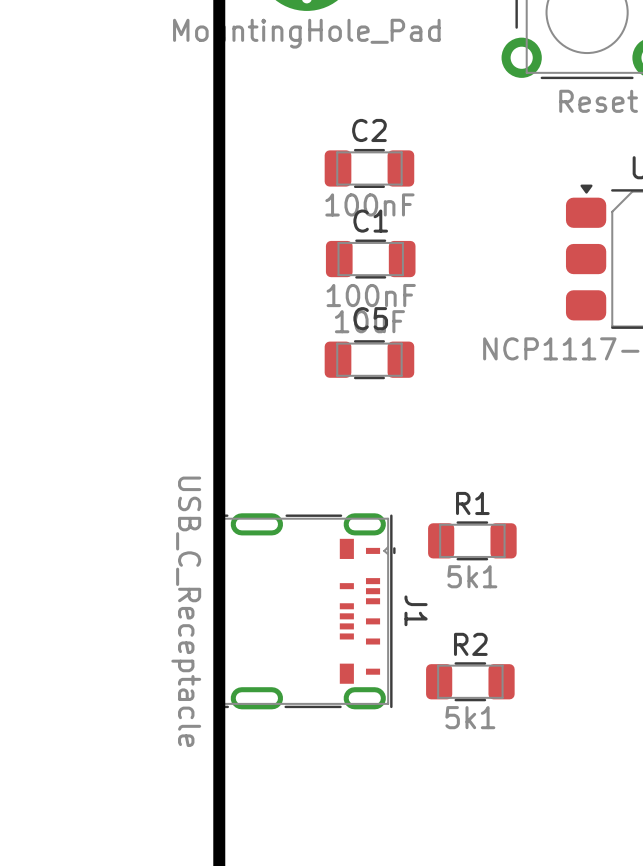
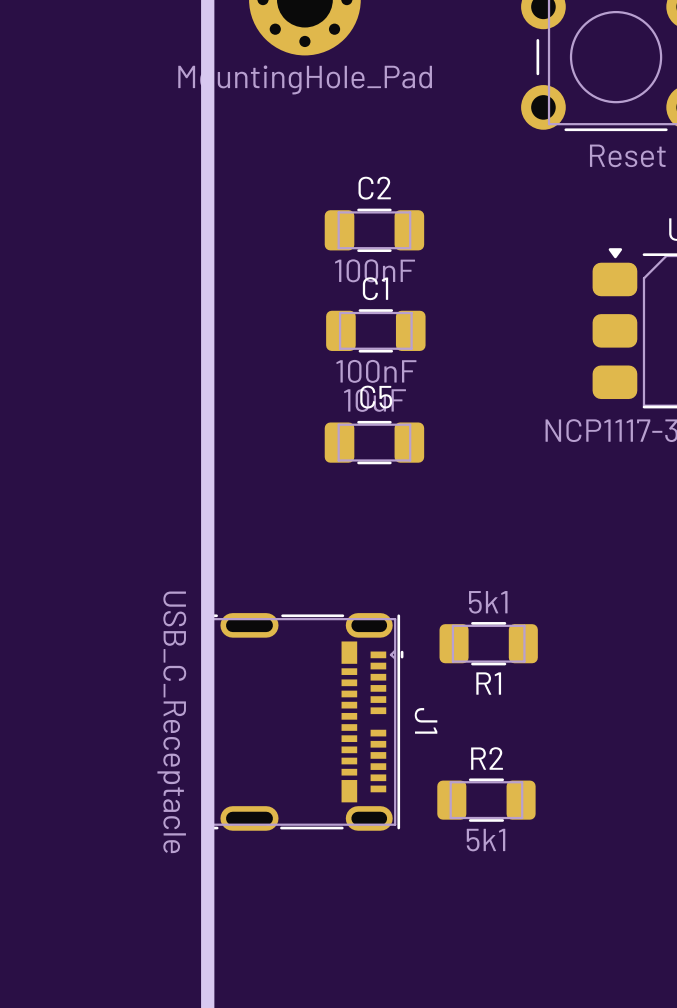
R1 name position: R1 (472, 503) -> R1 (488, 683)
J1 footprint: [216, 513, 396, 710] -> [204, 613, 404, 831]
R1 value position: 5k1 (472, 576) -> 5k1 (488, 602)

